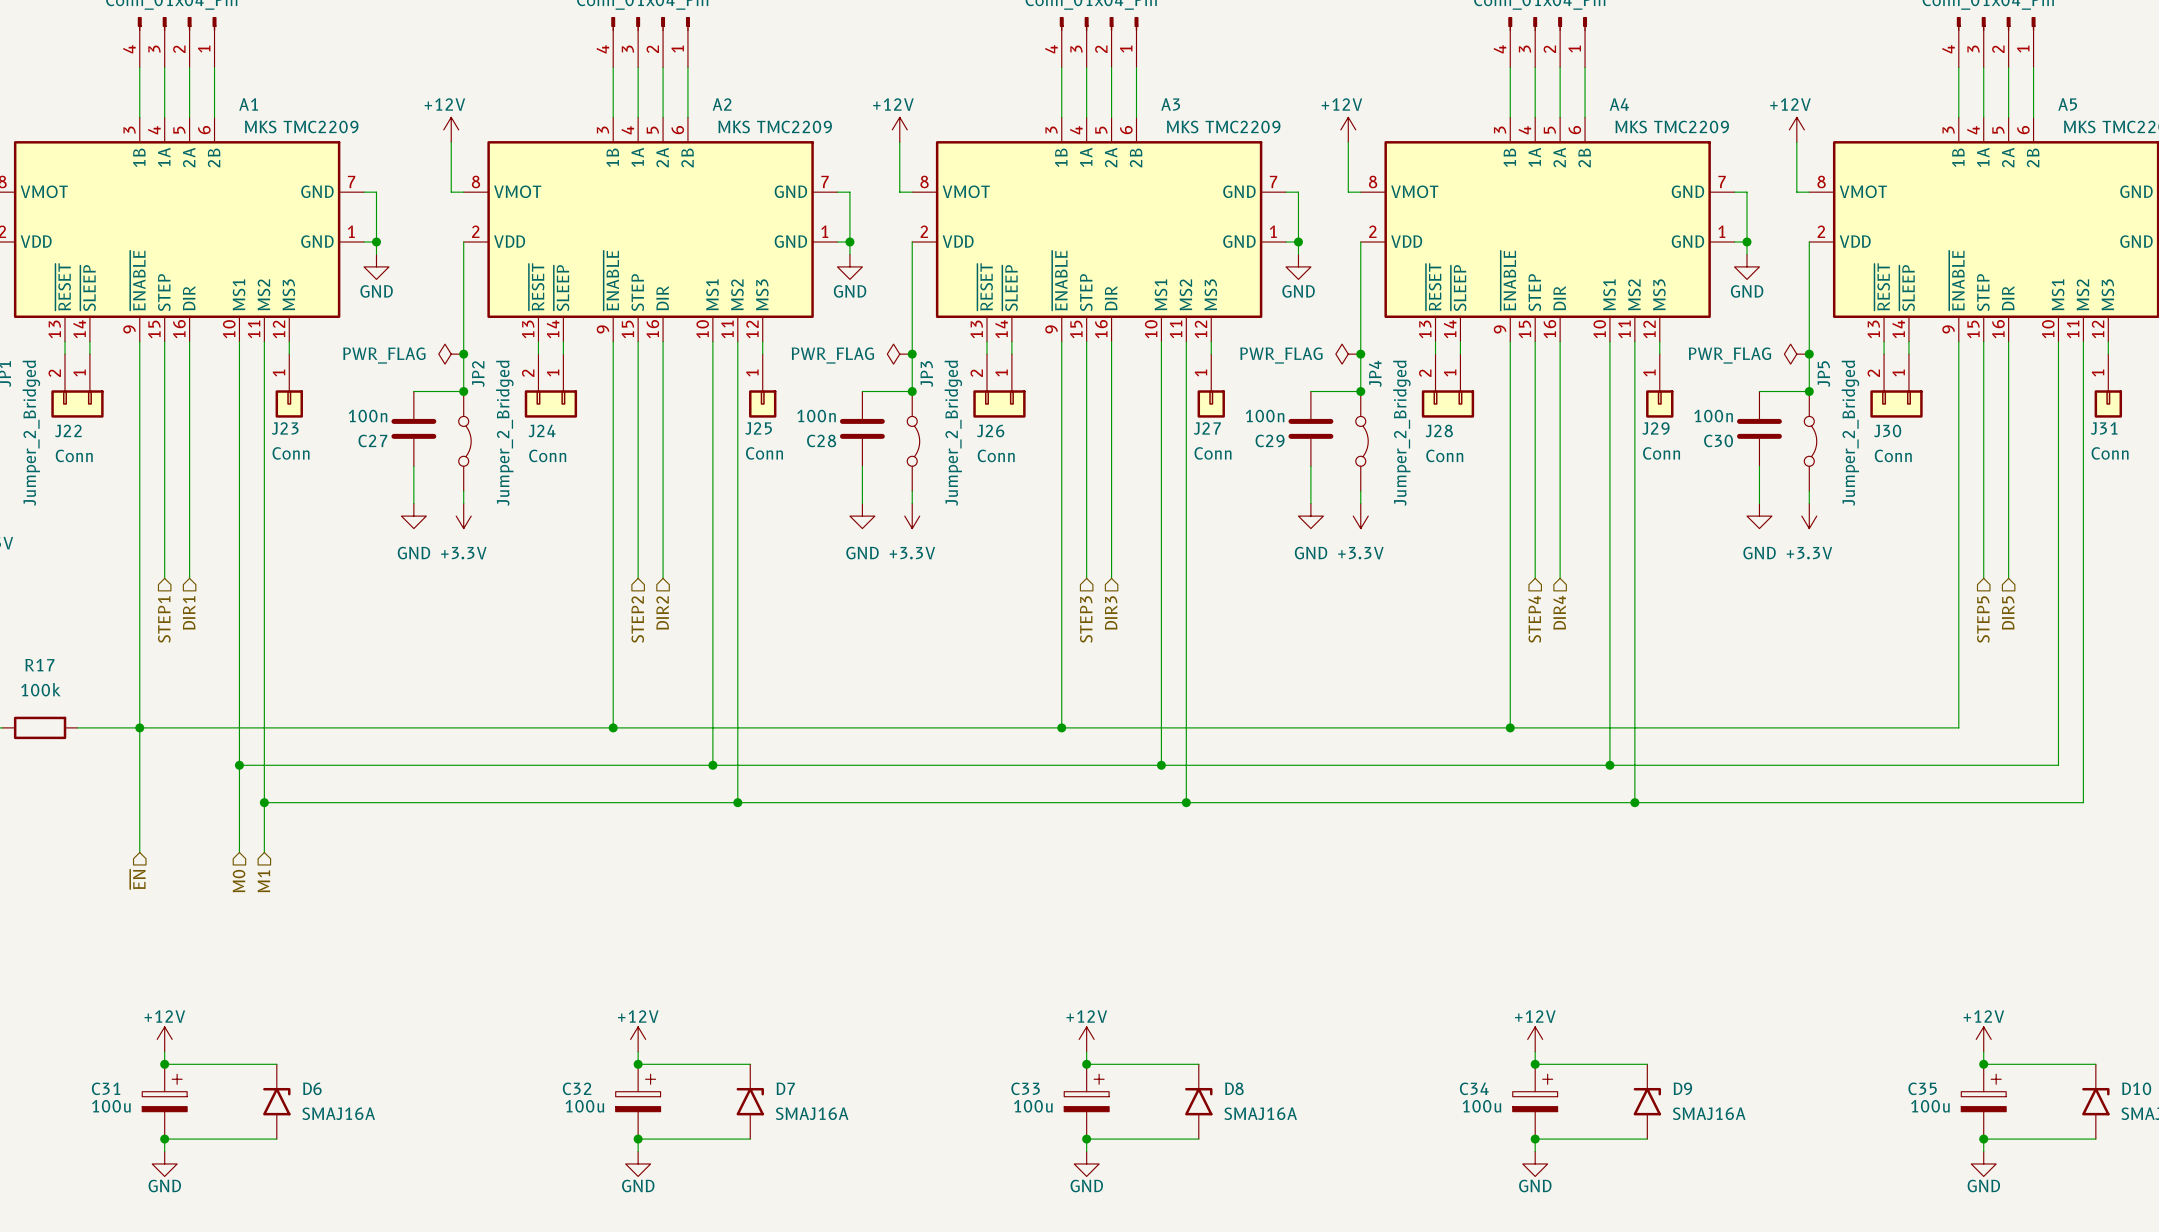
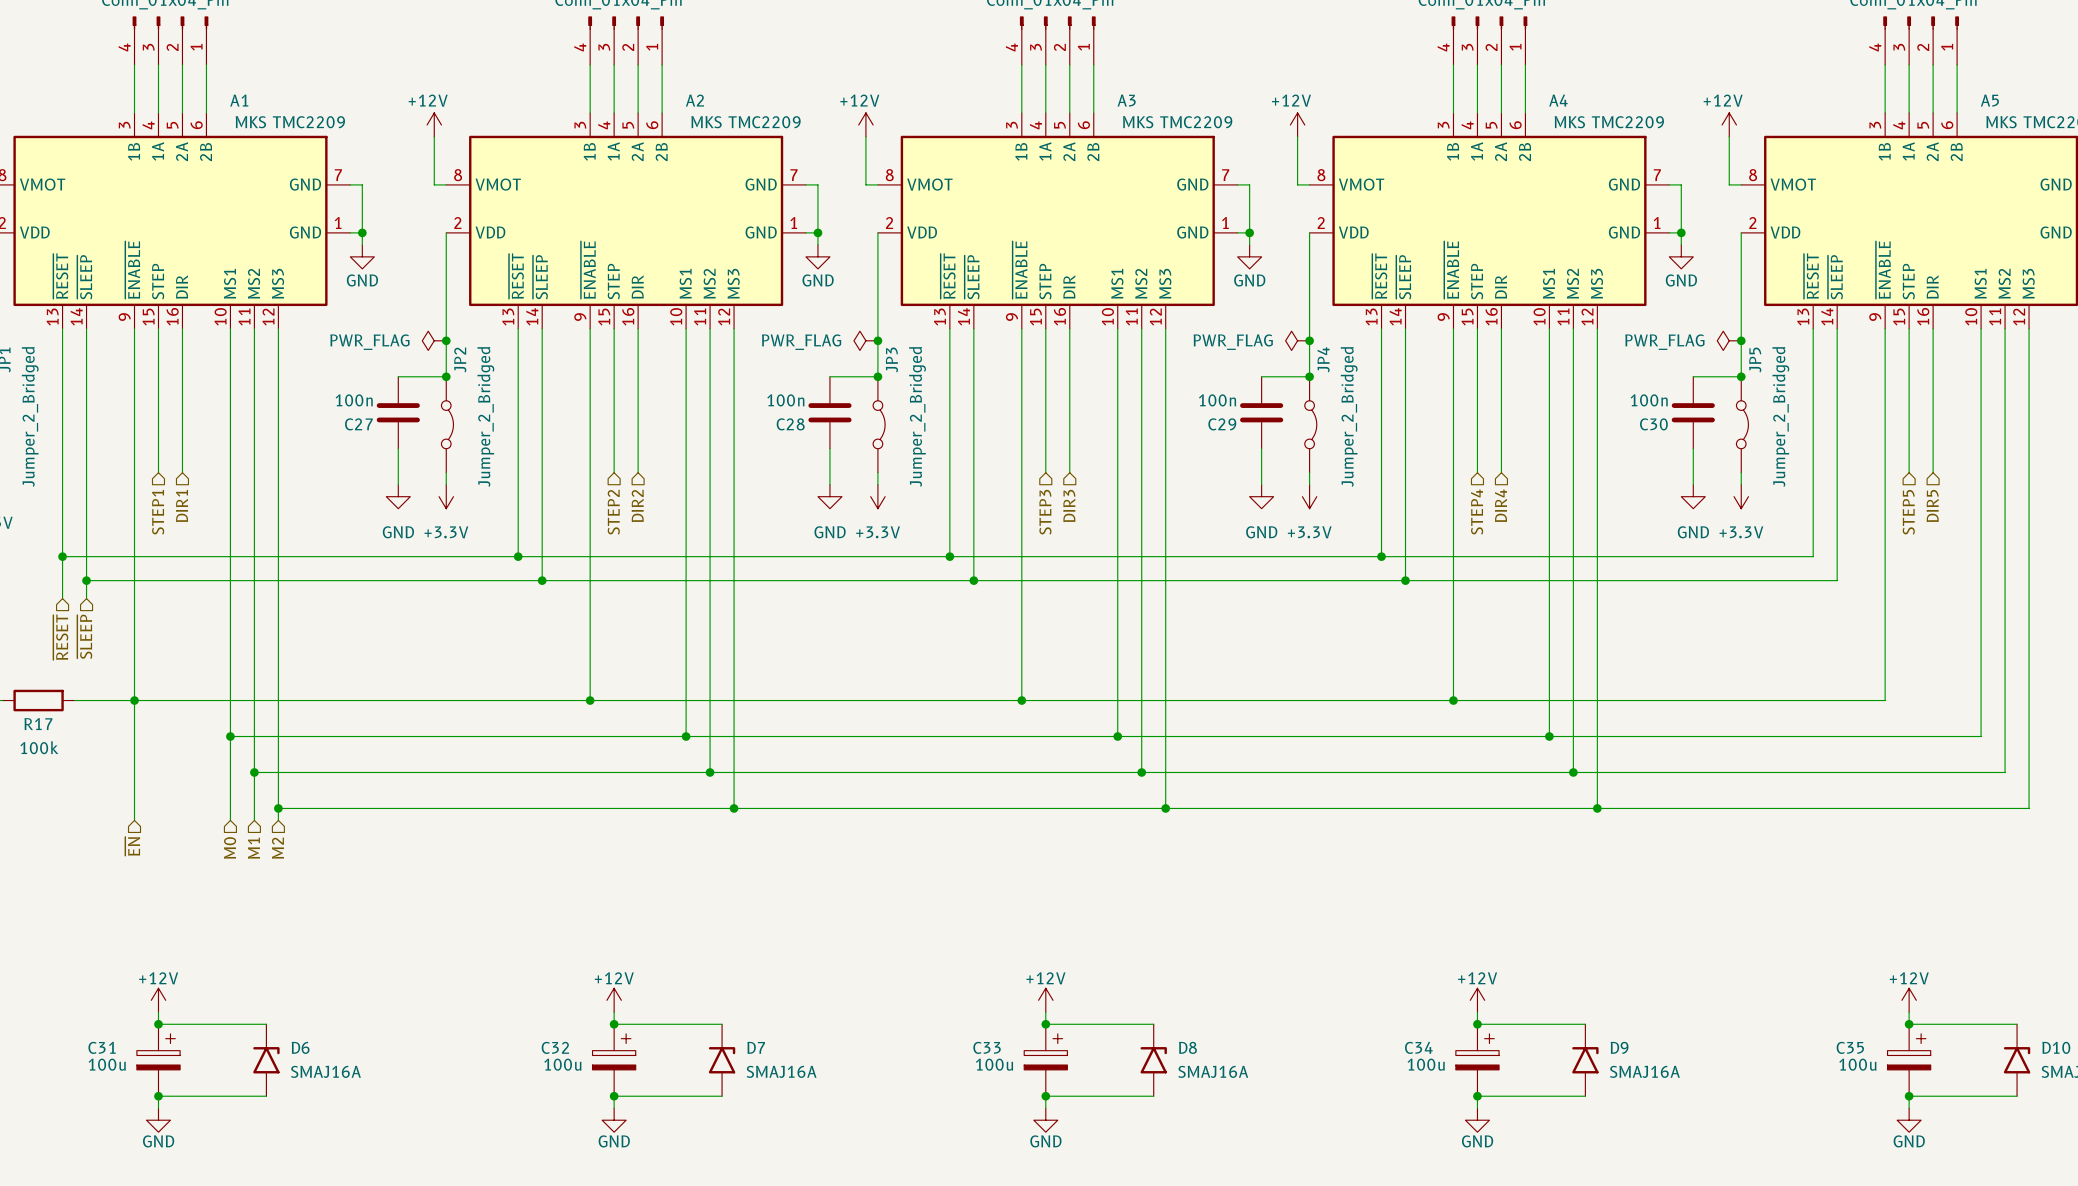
wire: none -> (62, 340) (62, 598)
wire: none -> (86, 340) (86, 598)
wire: none -> (278, 340) (278, 820)
wire: none -> (518, 340) (518, 556)
wire: none -> (542, 340) (542, 580)
wire: none -> (734, 340) (734, 808)
wire: none -> (949, 340) (949, 556)
wire: none -> (973, 340) (973, 580)
wire: none -> (1165, 340) (1165, 808)
wire: none -> (1381, 340) (1381, 556)
wire: none -> (1405, 340) (1405, 580)
wire: none -> (1597, 340) (1597, 808)
wire: none -> (1813, 340) (1813, 556) (62, 556)
wire: none -> (1837, 340) (1837, 580) (86, 580)
wire: none -> (2029, 340) (2029, 808) (278, 808)
J22: Conn (77, 385) -> none
J23: Conn (289, 385) -> none
J24: Conn (550, 385) -> none
J25: Conn (762, 385) -> none
J26: Conn (999, 385) -> none
J27: Conn (1211, 385) -> none
J28: Conn (1447, 385) -> none
J29: Conn (1659, 385) -> none
J30: Conn (1896, 385) -> none
J31: Conn (2108, 385) -> none
wire: (164, 491) (164, 578) -> none
wire: (189, 491) (189, 578) -> none
wire: (638, 491) (638, 578) -> none
wire: (663, 491) (663, 578) -> none
wire: (1086, 491) (1086, 578) -> none
wire: (1111, 491) (1111, 578) -> none
wire: (1535, 491) (1535, 578) -> none
wire: (1560, 491) (1560, 578) -> none
wire: (1983, 491) (1983, 578) -> none
wire: (2008, 491) (2008, 578) -> none
junction: none -> (62, 556)
junction: none -> (518, 556)
junction: none -> (949, 556)
junction: none -> (1381, 556)
junction: none -> (86, 580)
junction: none -> (542, 580)
junction: none -> (973, 580)
junction: none -> (1405, 580)
hierarchical label position: DIR1 (189, 612) -> DIR1 (182, 506)
hierarchical label position: DIR2 (662, 612) -> DIR2 (637, 505)
hierarchical label position: DIR3 (1111, 612) -> DIR3 (1069, 505)
hierarchical label position: DIR4 (1559, 612) -> DIR4 (1500, 505)
hierarchical label position: DIR5 (2008, 612) -> DIR5 (1932, 506)
hierarchical label position: STEP1 (164, 619) -> STEP1 (158, 512)
hierarchical label position: STEP2 (637, 619) -> STEP2 (613, 512)
hierarchical label position: STEP3 (1086, 619) -> STEP3 (1045, 512)
hierarchical label position: STEP4 (1534, 619) -> STEP4 (1477, 512)
hierarchical label position: STEP5 (1983, 619) -> STEP5 (1908, 512)
hierarchical label: none -> ~{SLEEP} (84, 636)
hierarchical label: none -> ~{RESET} (60, 637)
R17 name position: R17 (39, 665) -> R17 (38, 724)
R17 value position: 100k (40, 689) -> 100k (39, 747)
junction: none -> (278, 808)
junction: none -> (734, 808)
junction: none -> (1165, 808)
junction: none -> (1597, 808)
hierarchical label: none -> M2 (277, 848)

